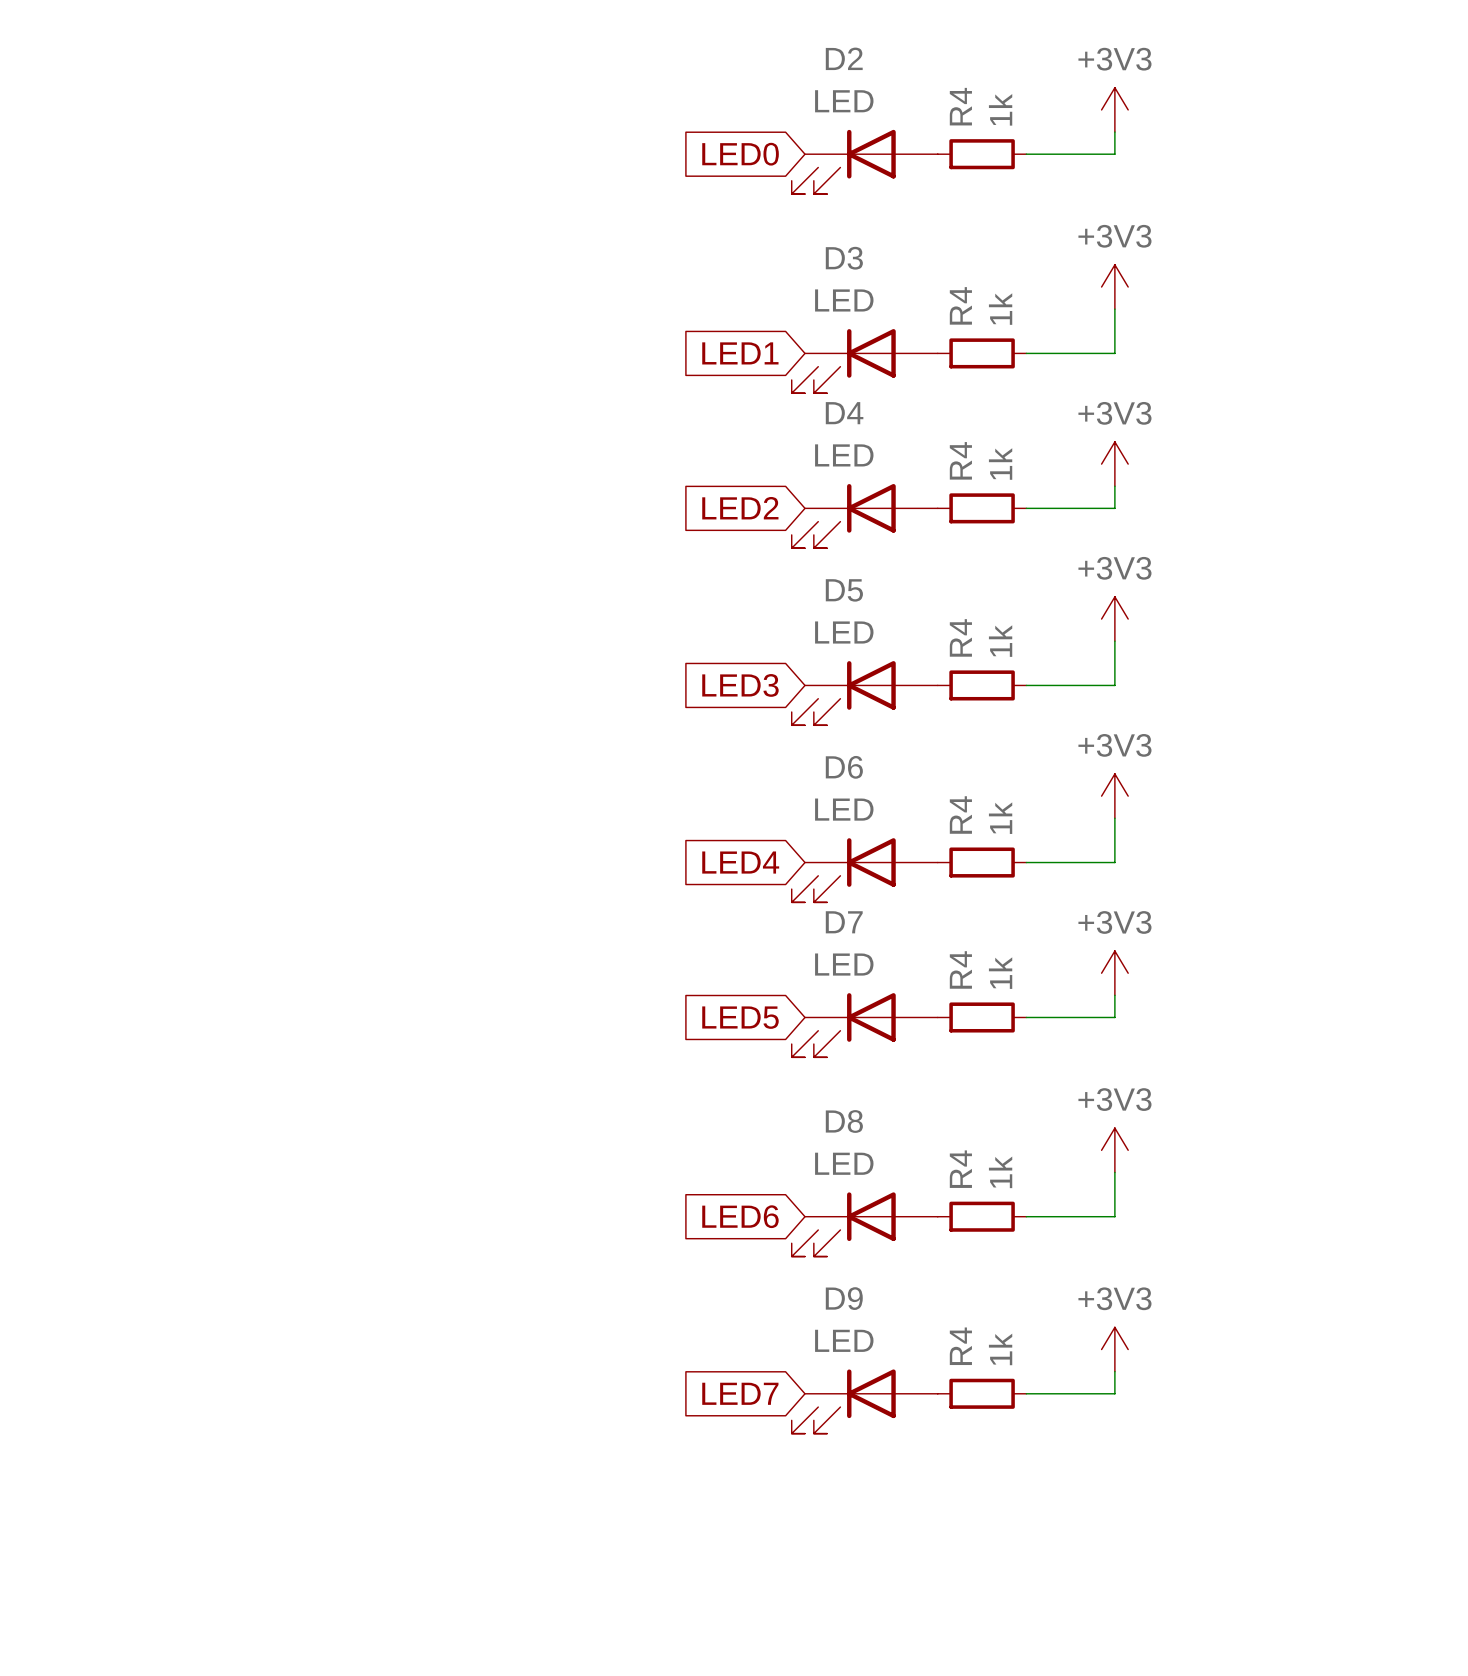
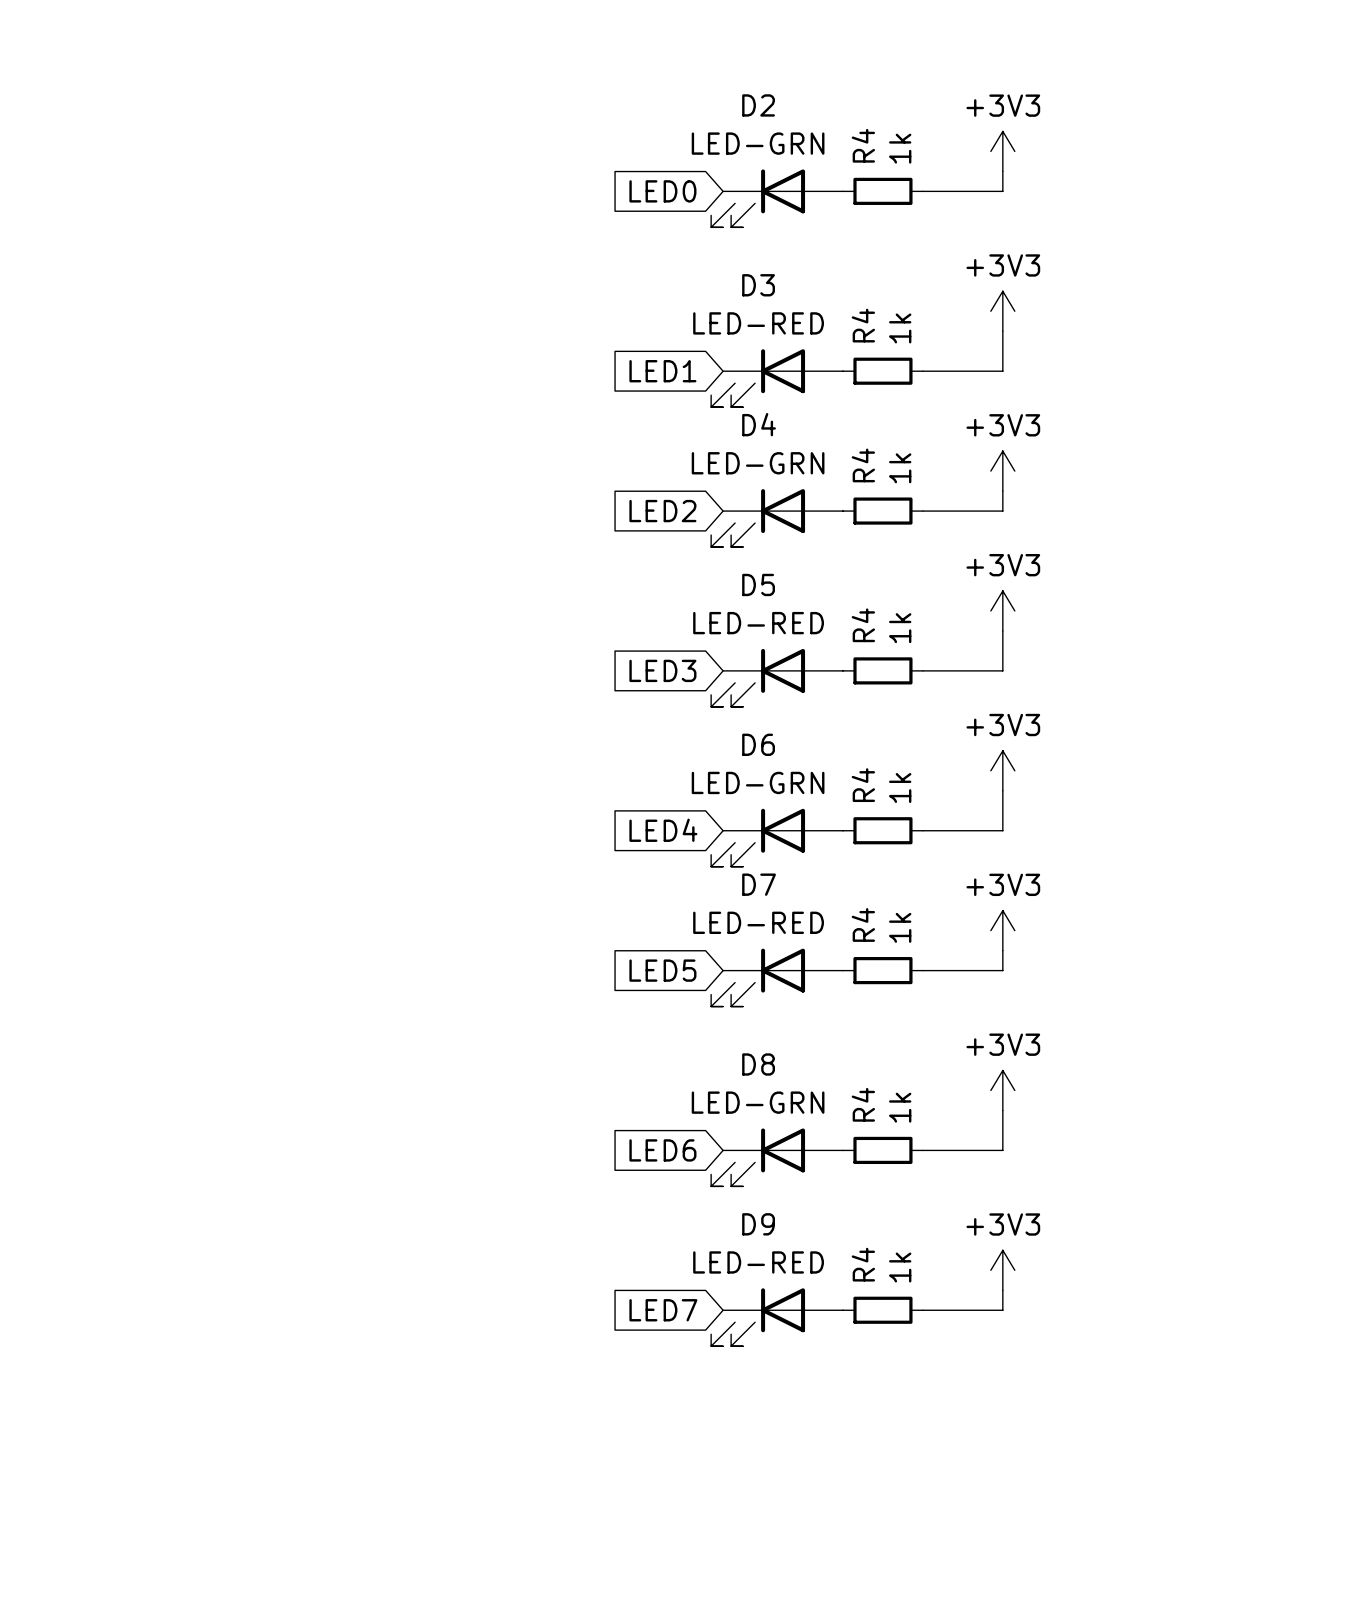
D2 value: LED (844, 101) -> LED-GRN (758, 143)
D3 value: LED (844, 300) -> LED-RED (758, 323)
D4 value: LED (844, 455) -> LED-GRN (758, 463)
D5 value: LED (844, 632) -> LED-RED (758, 623)
D6 value: LED (844, 809) -> LED-GRN (758, 782)
D7 value: LED (844, 964) -> LED-RED (758, 922)
D8 value: LED (844, 1163) -> LED-GRN (758, 1102)
D9 value: LED (844, 1340) -> LED-RED (758, 1262)

